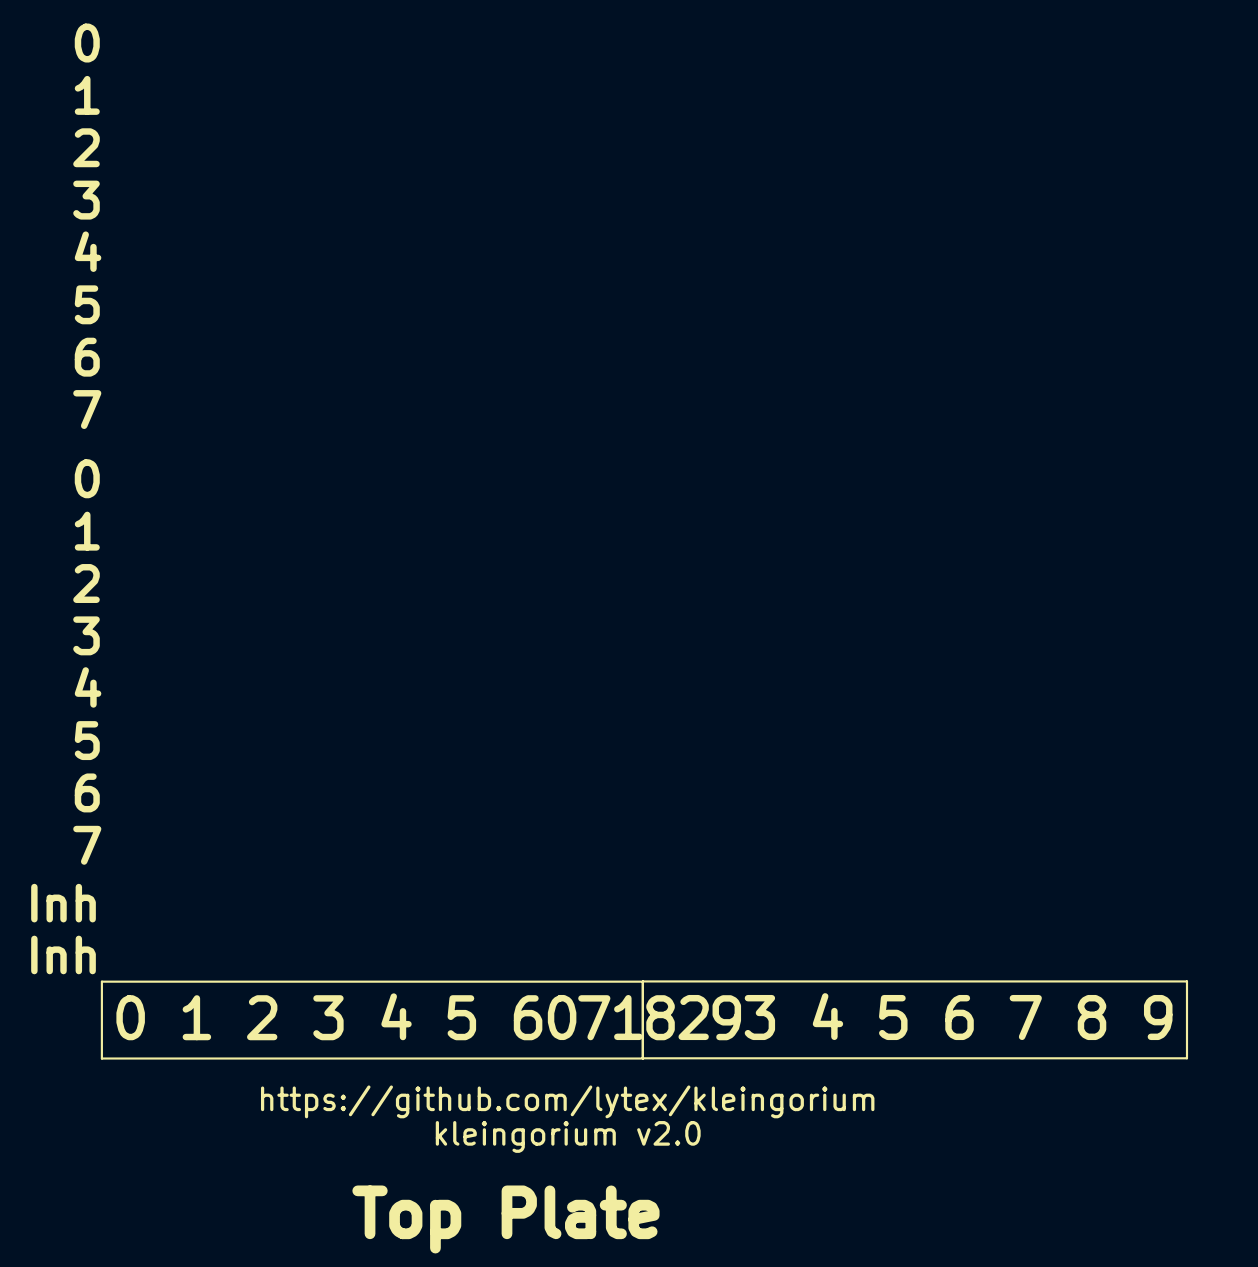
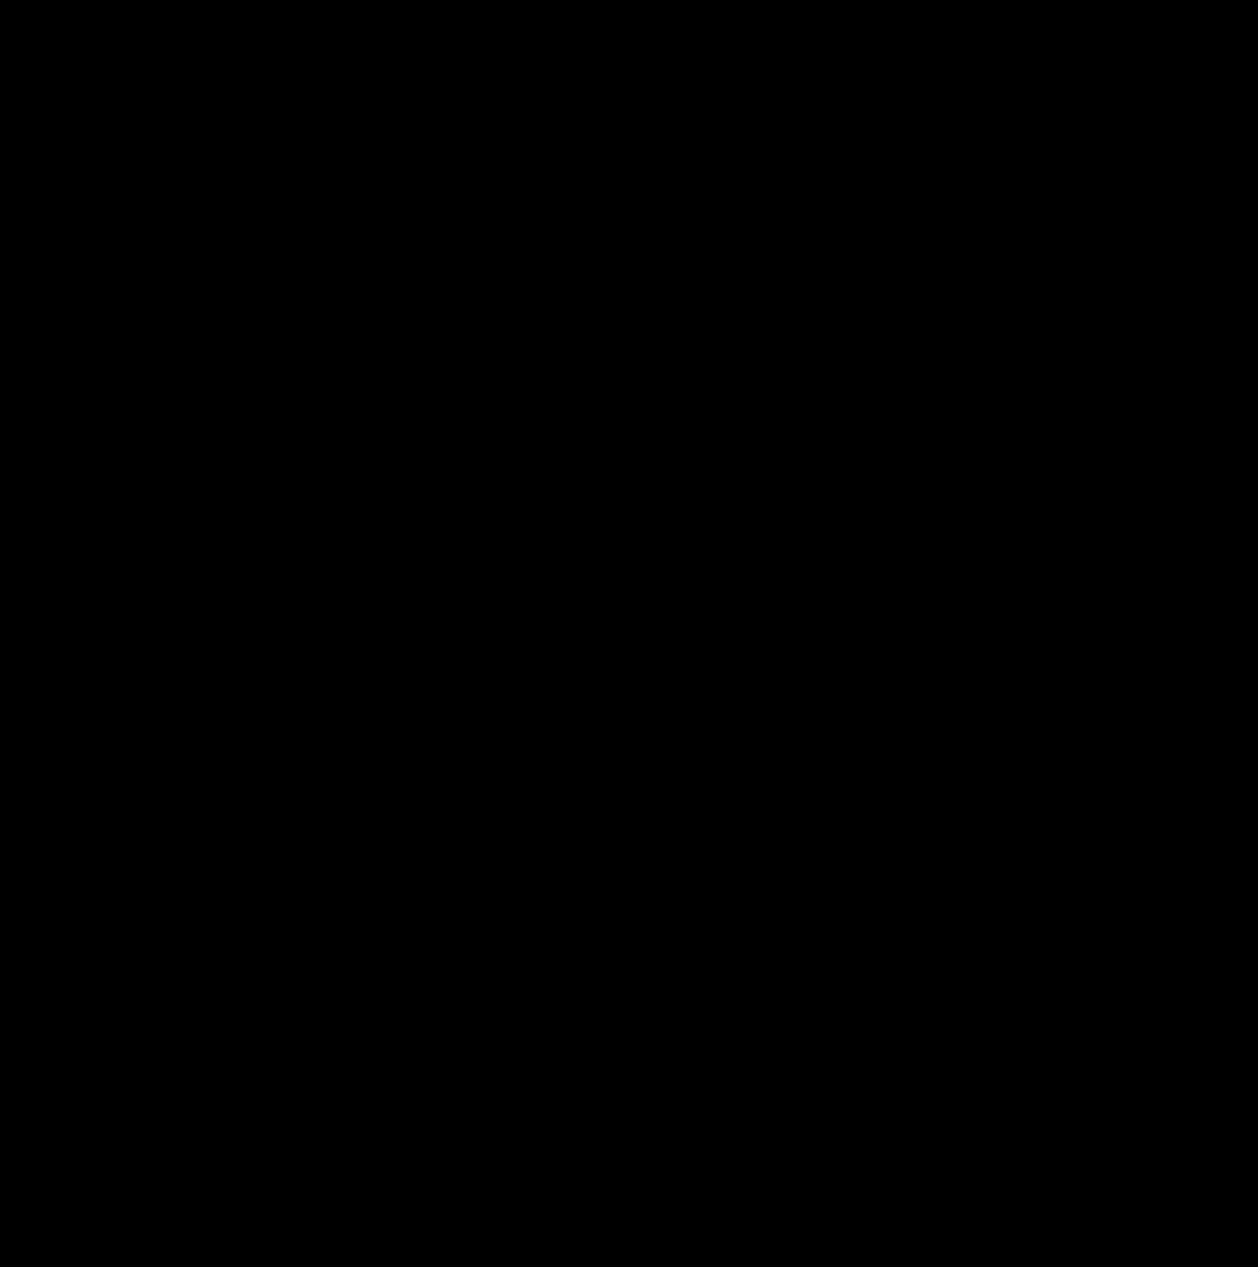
text: 0 (87, 43) -> none
text: 1 (87, 95) -> none
text: 2 (86, 147) -> none
text: 3 (86, 200) -> none
text: 4 (88, 251) -> none
text: 5 (87, 304) -> none
text: 6 (87, 357) -> none
text: 7 (87, 409) -> none
text: 0 (87, 478) -> none
text: 1 (87, 531) -> none
text: 2 (86, 583) -> none
text: 3 (86, 635) -> none
text: 4 (88, 687) -> none
text: 5 (87, 740) -> none
text: 6 (87, 792) -> none
text: 7 (87, 845) -> none
text: Inh (63, 903) -> none
text: Inh (63, 954) -> none
line: (642, 981) (101, 981) (101, 1058) (642, 1058) (642, 981) (1186, 981) (1186, 1058) (642, 1058) -> none
text: 0 1 2 3 4 5 6 7 8 9 (428, 1016) -> none
text: 0 1 2 3 4 5 6 7 8 9 (860, 1016) -> none
text: https://github.com/lytex/kleingorium (567, 1101) -> none
text: kleingorium v2.0 (568, 1136) -> none
text: Top Plate (505, 1219) -> none

